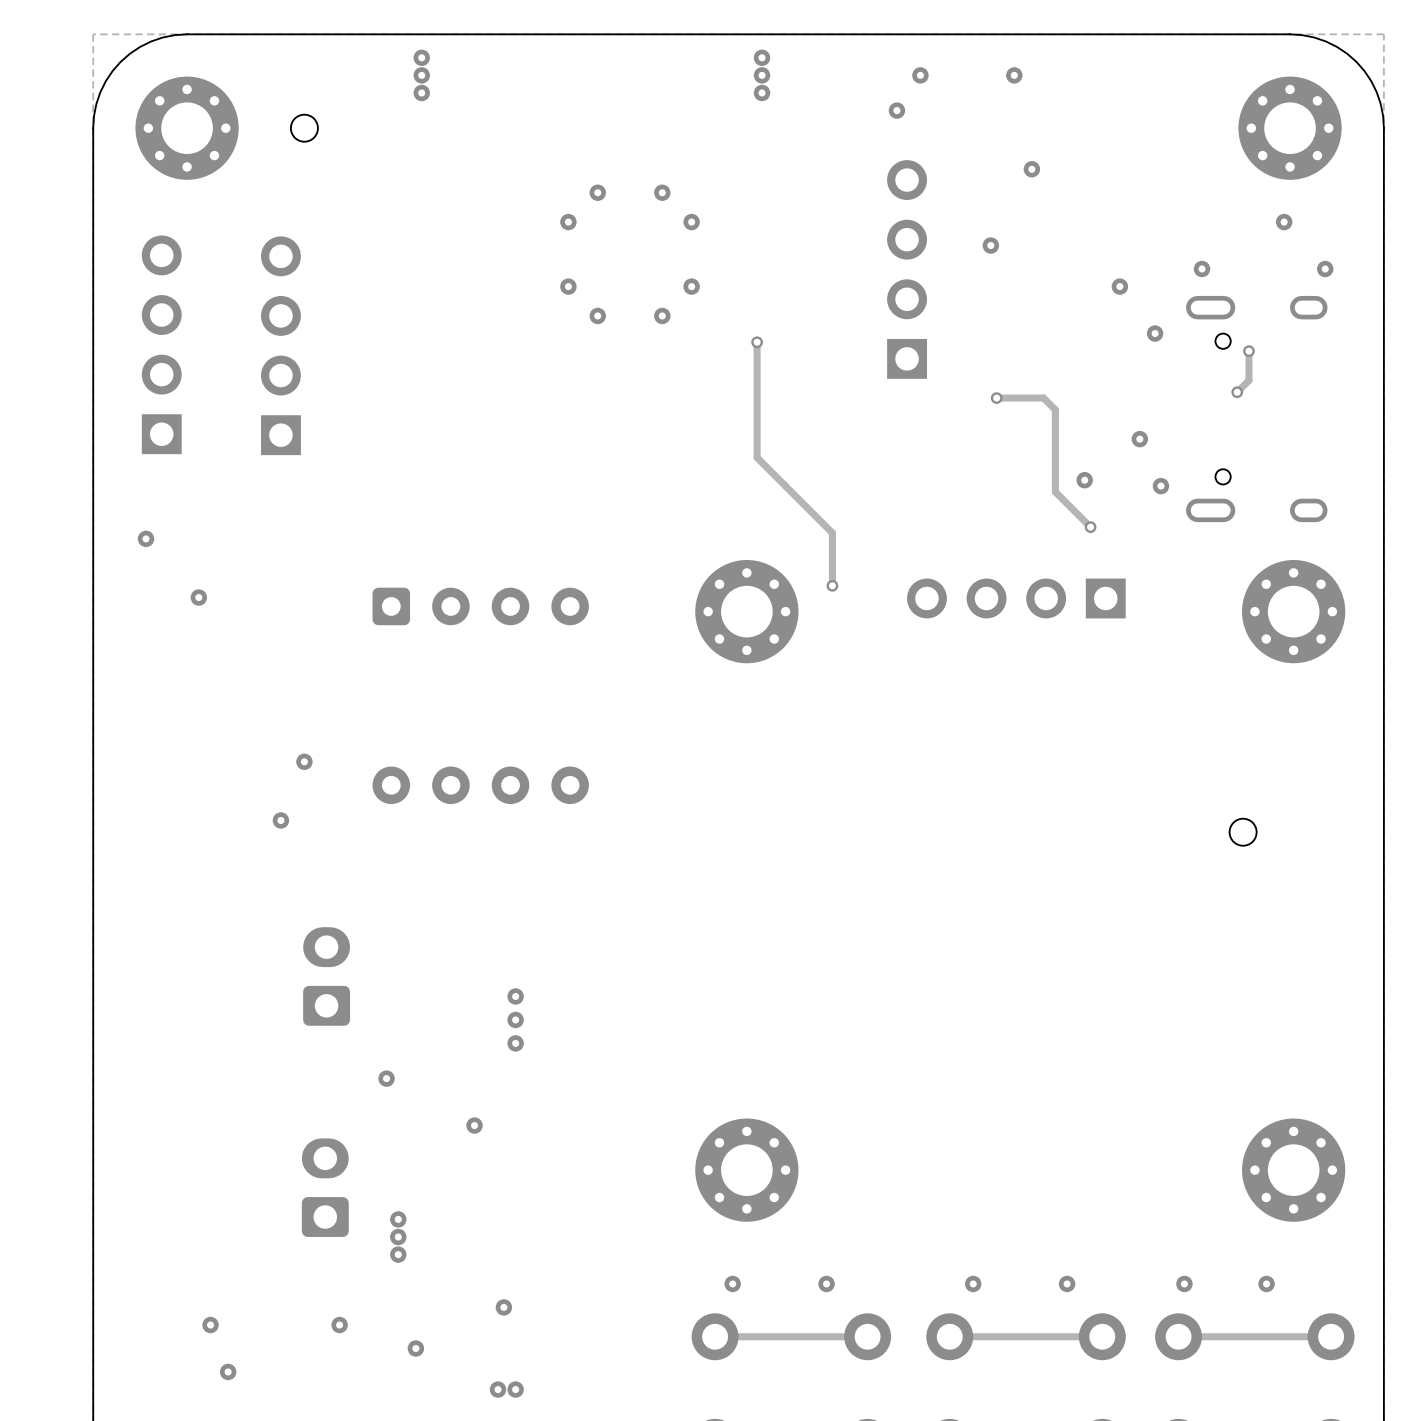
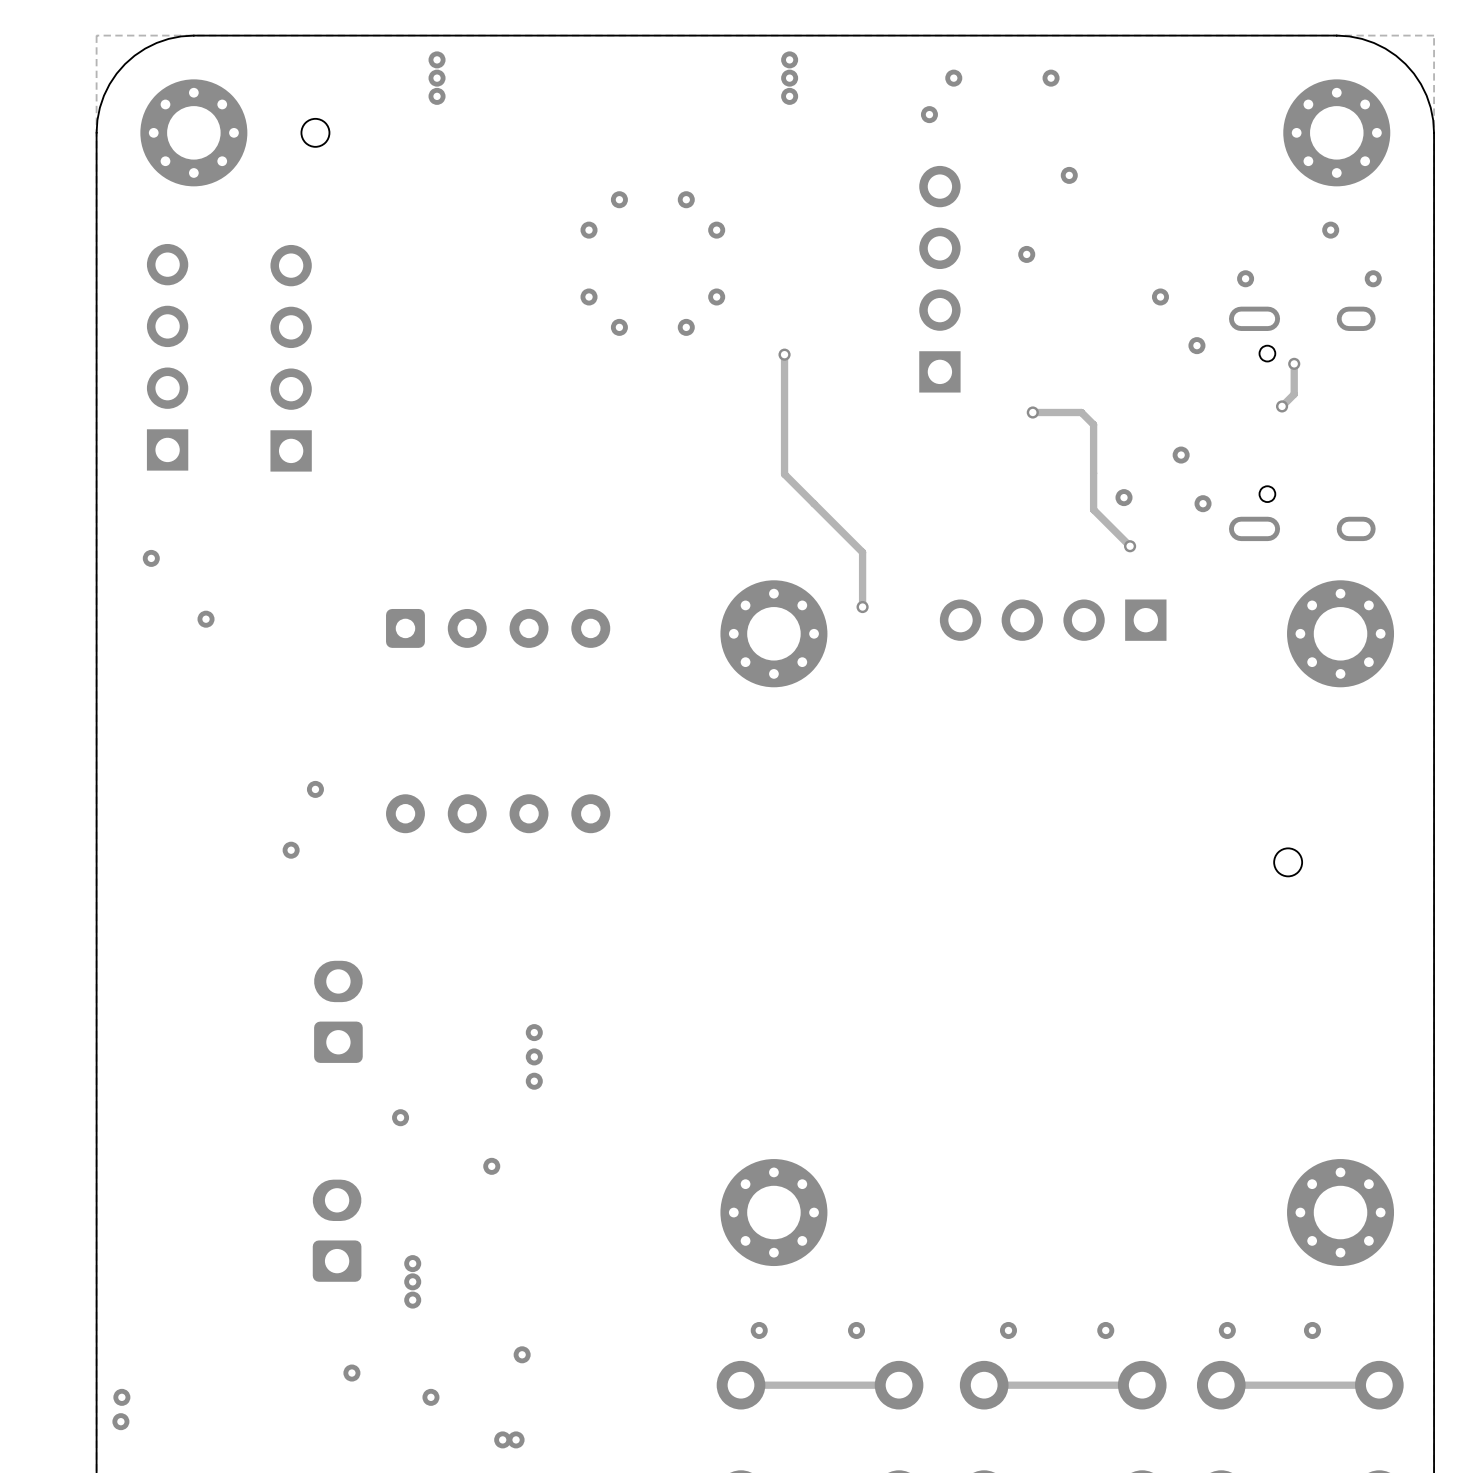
via: (210, 1325) -> none
via: none -> (121, 1397)
via: none -> (120, 1421)
via: (228, 1371) -> none
via position: (515, 1389) -> (502, 1439)

